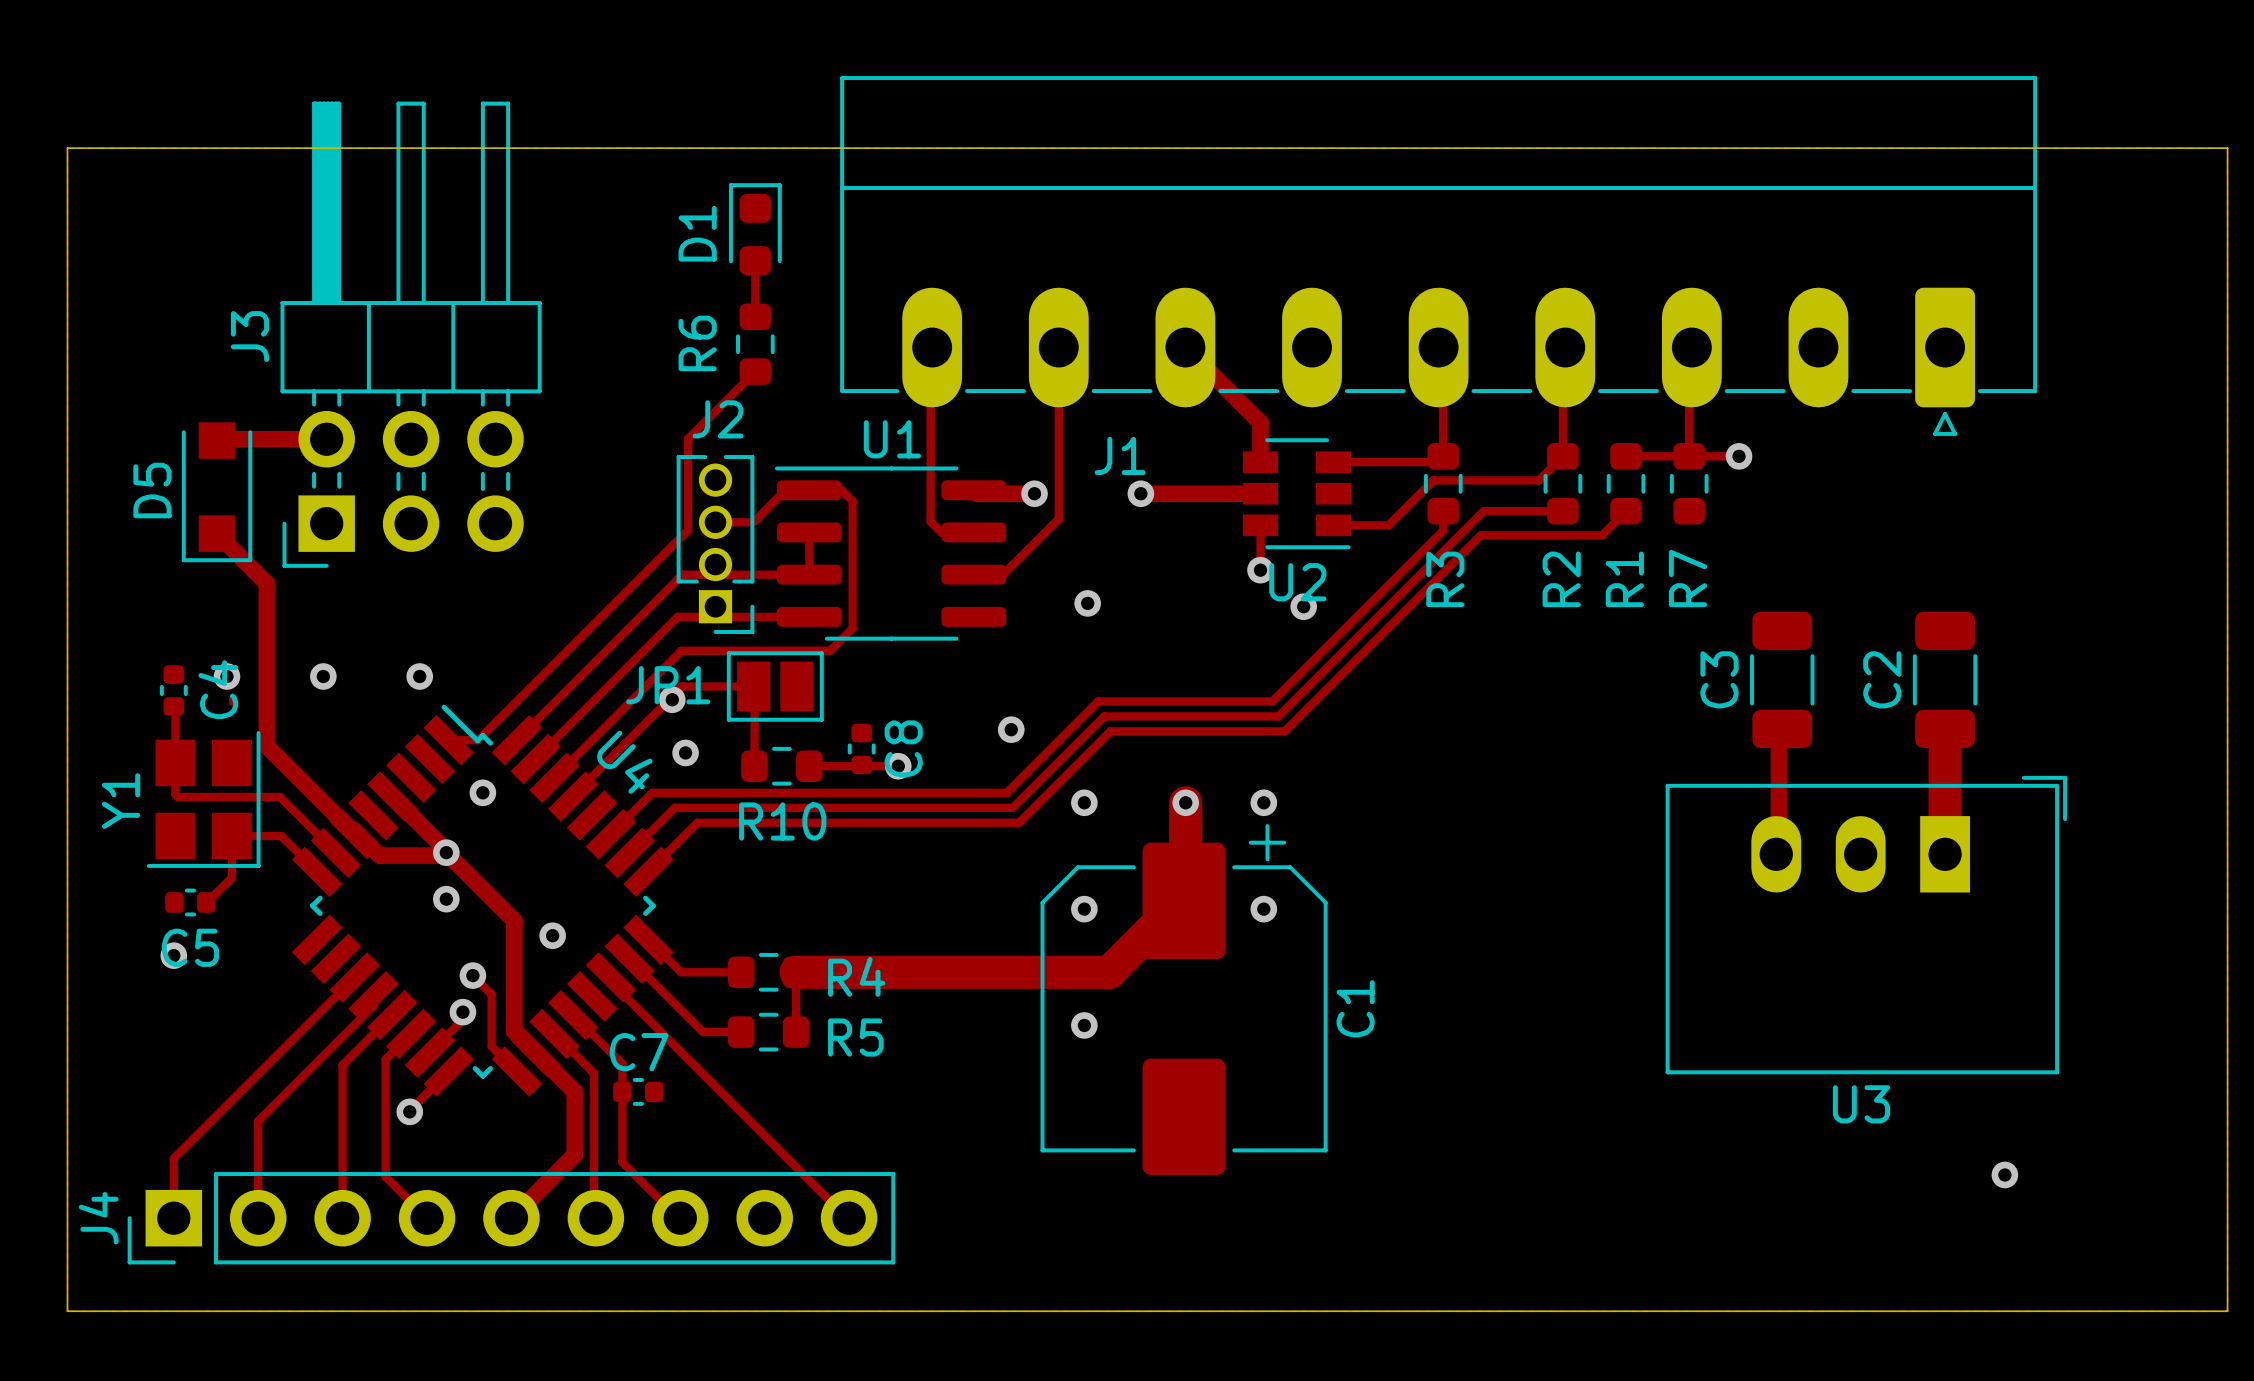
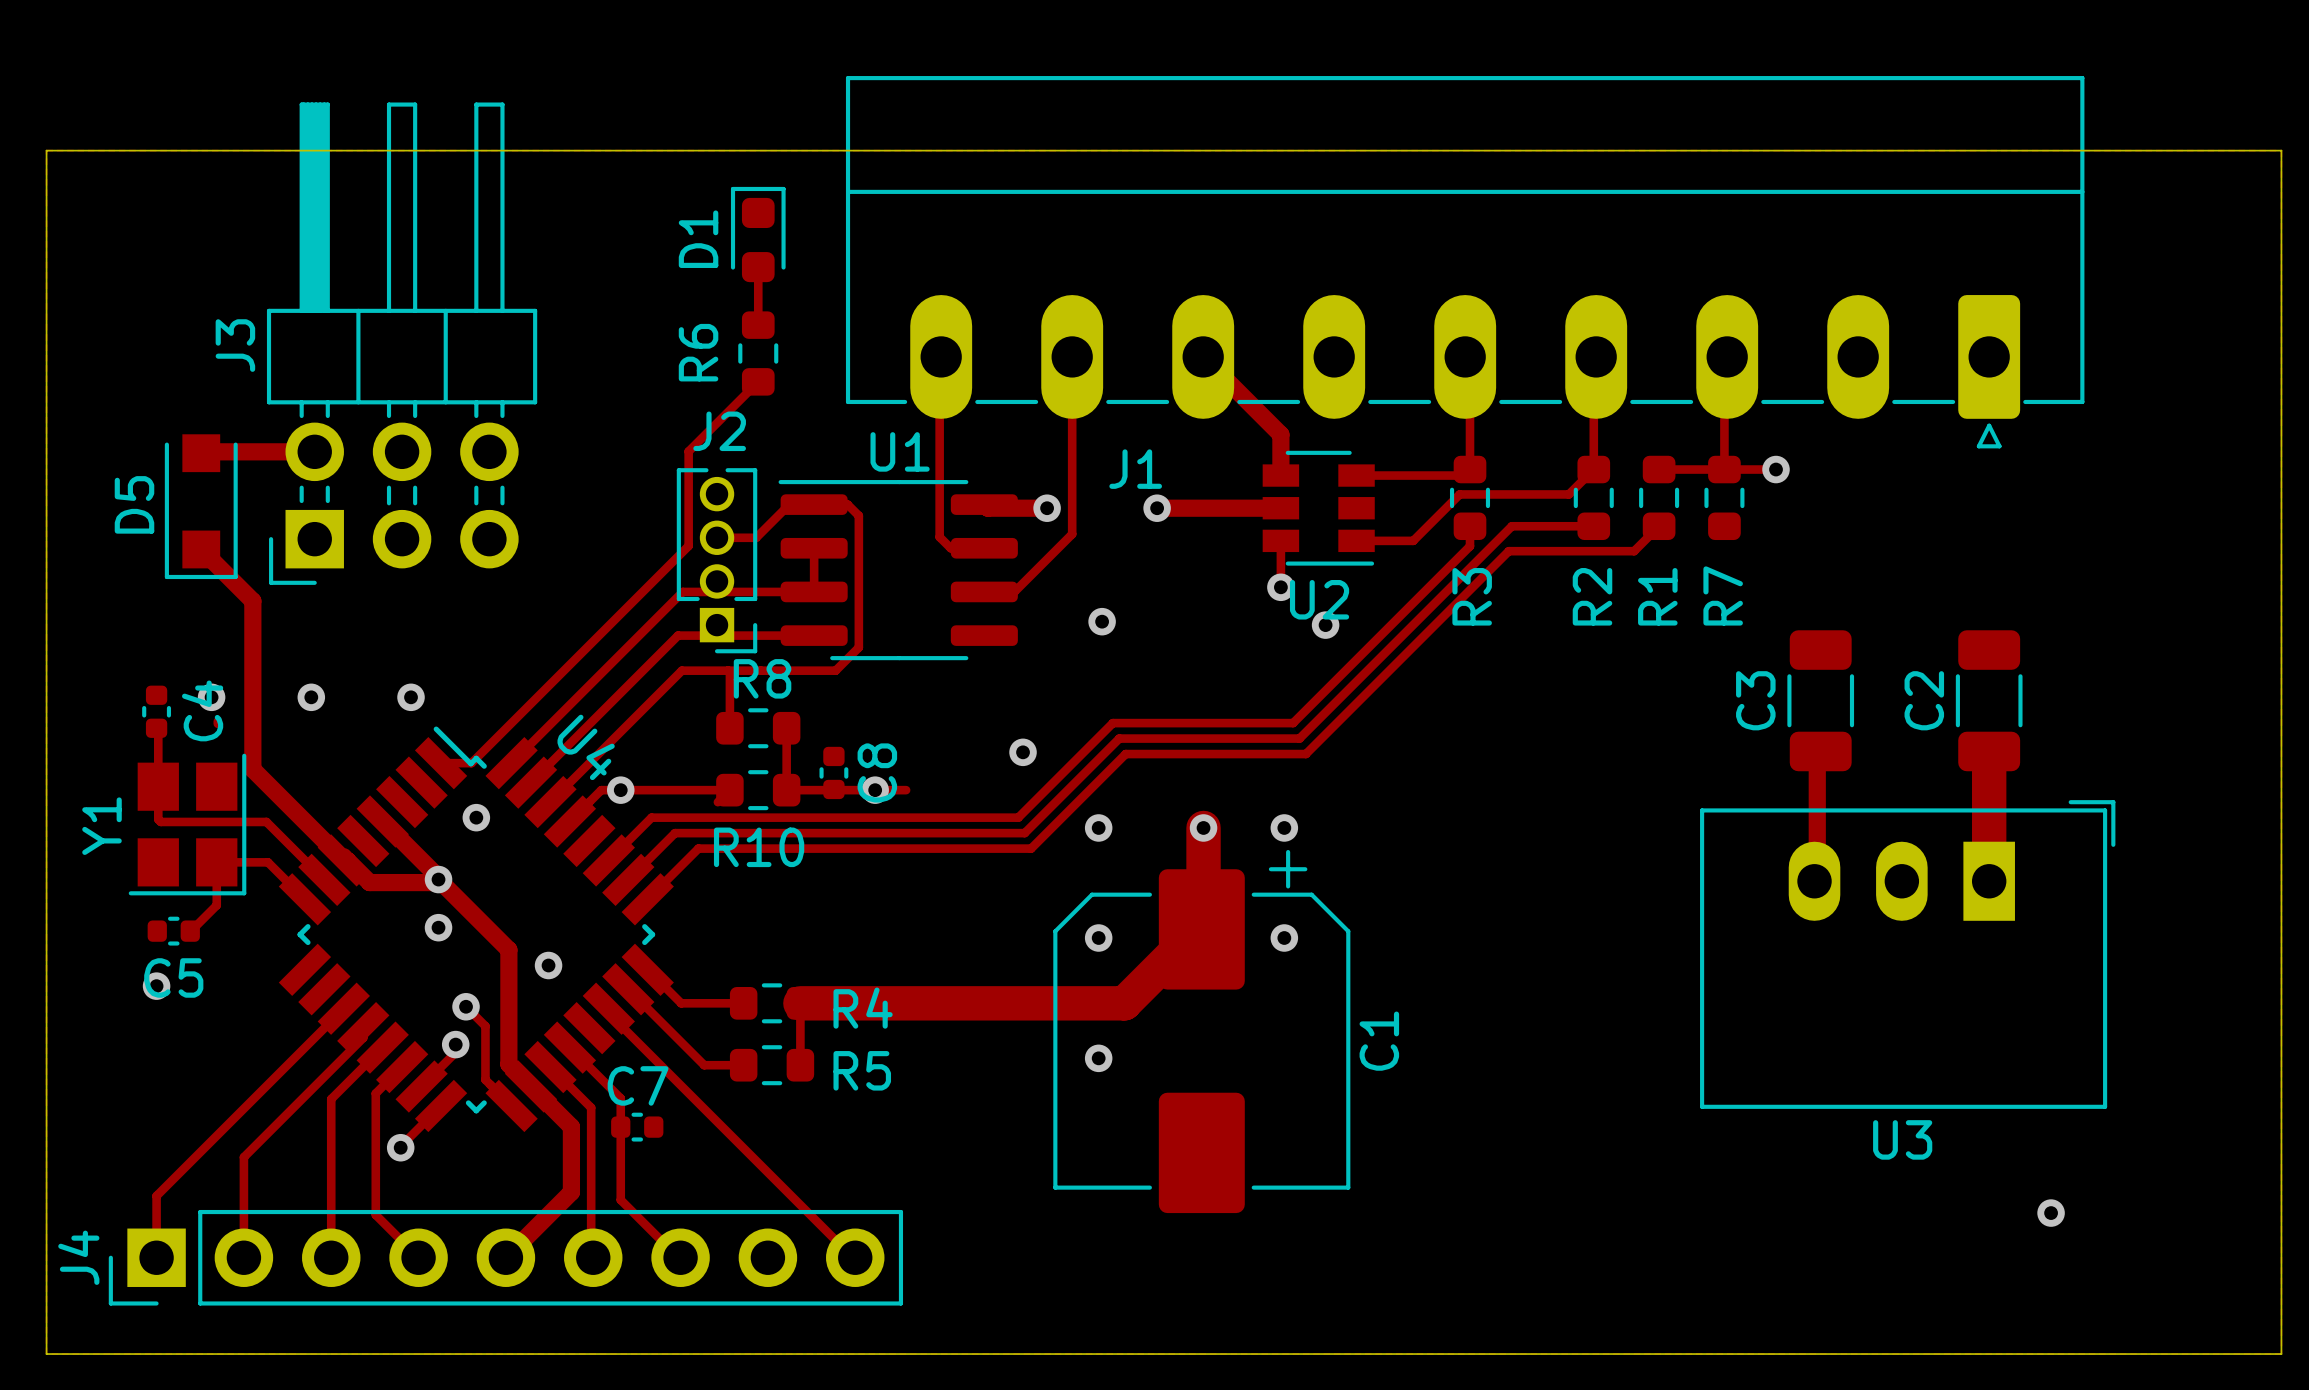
track: none -> (728, 670) (729, 672) (729, 735)
JP1: (775, 686) -> none
via: (672, 699) -> none
R8: none -> (758, 728)
track: none -> (786, 735) (786, 790) (814, 790)
C8 position: (861, 748) -> (833, 772)
via: (685, 752) -> none
U4 name position: U4 (624, 762) -> U4 (586, 747)
via: none -> (620, 790)
track: (754, 766) (754, 687) (682, 686) (573, 796) -> none
R10 position: (781, 766) -> (758, 790)
via position: (898, 766) -> (875, 790)
track: none -> (717, 802) (729, 790) (601, 790) (569, 821) (572, 821)

